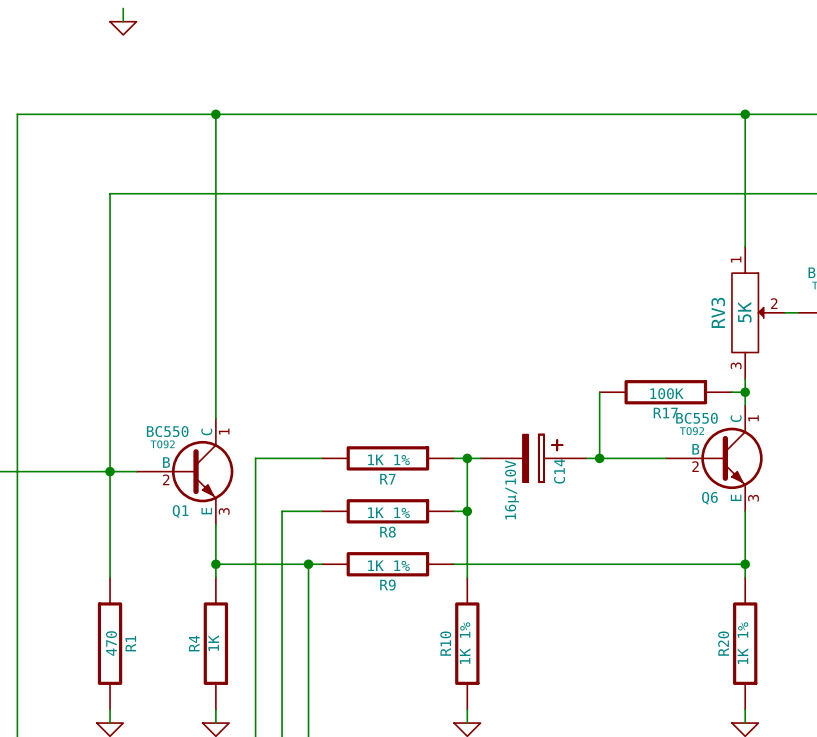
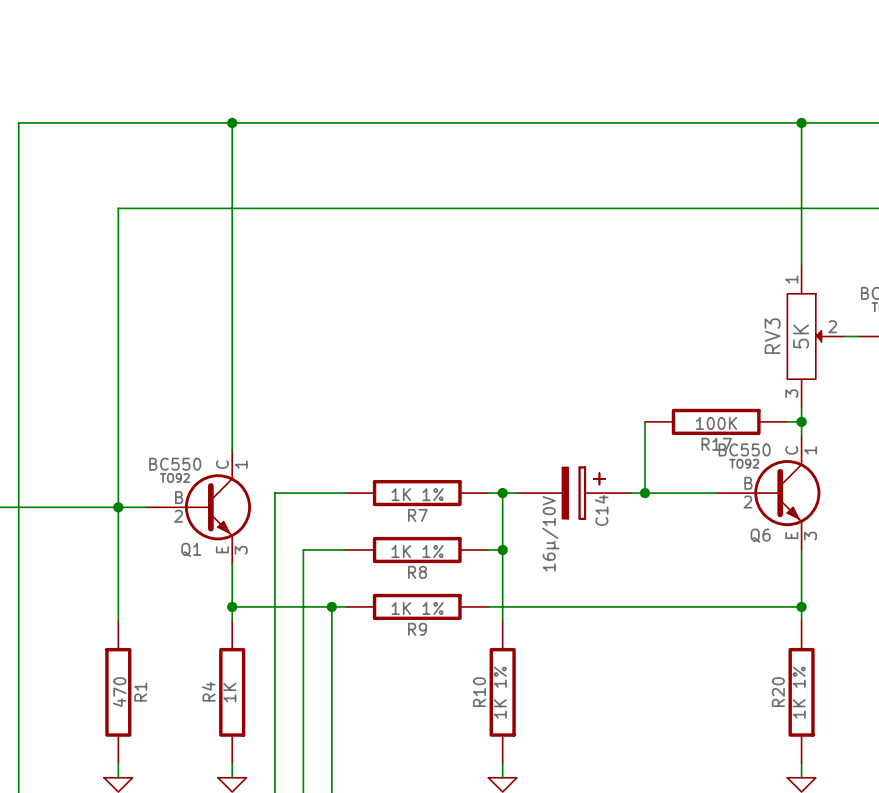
wire: (123, 8) (123, 21) -> none
power symbol: (123, 28) -> none

